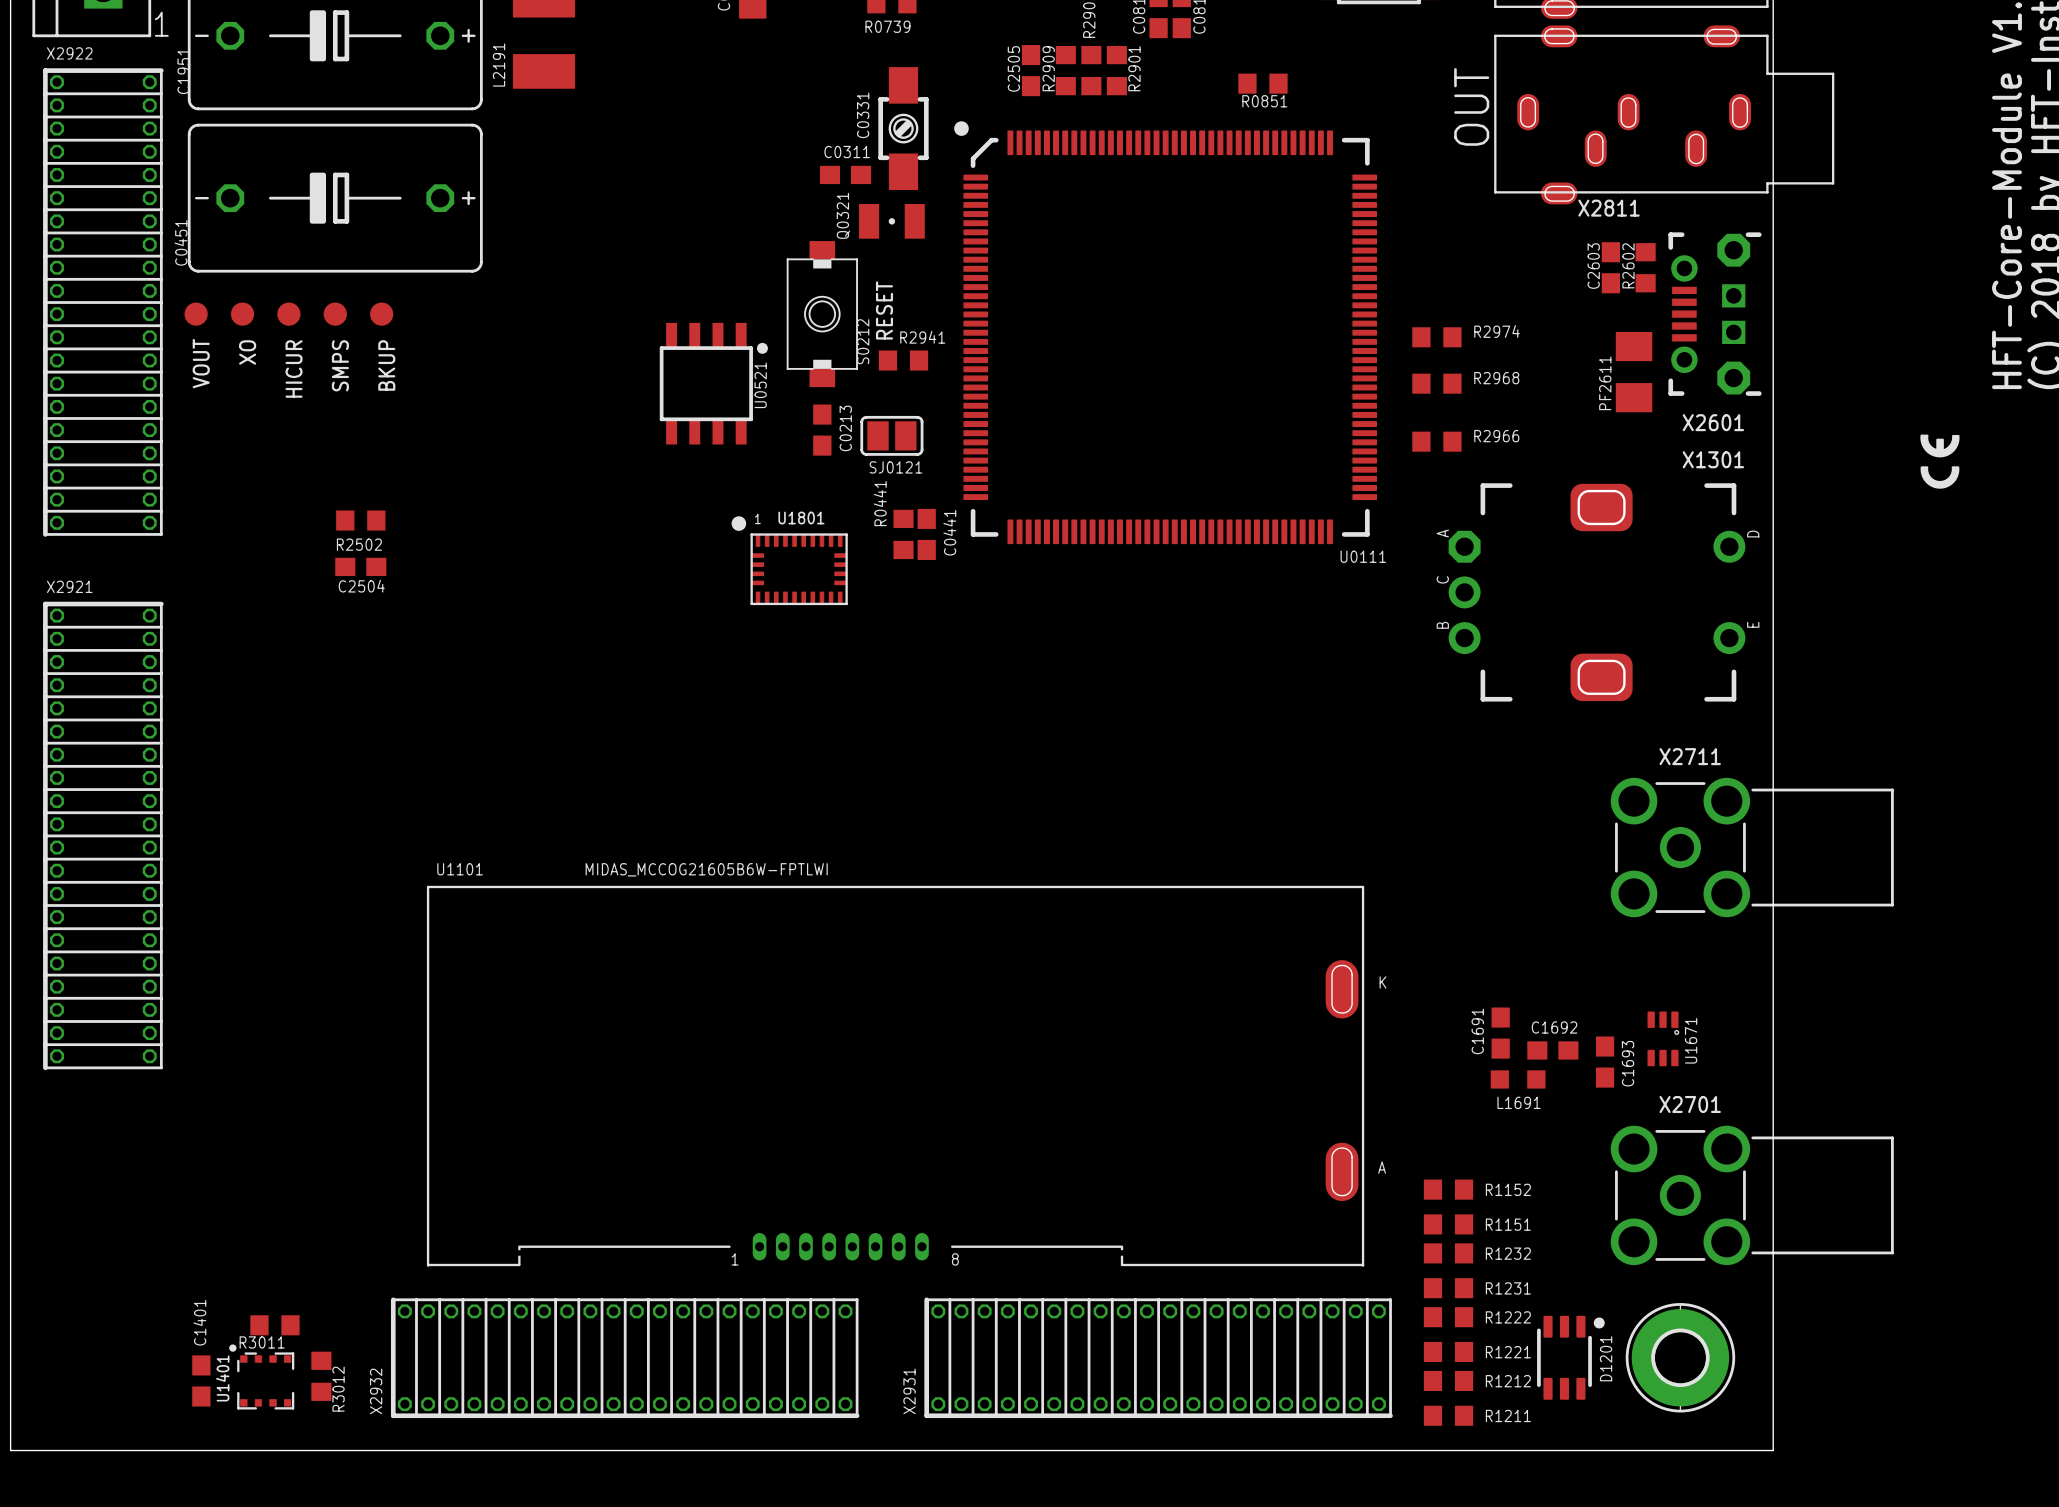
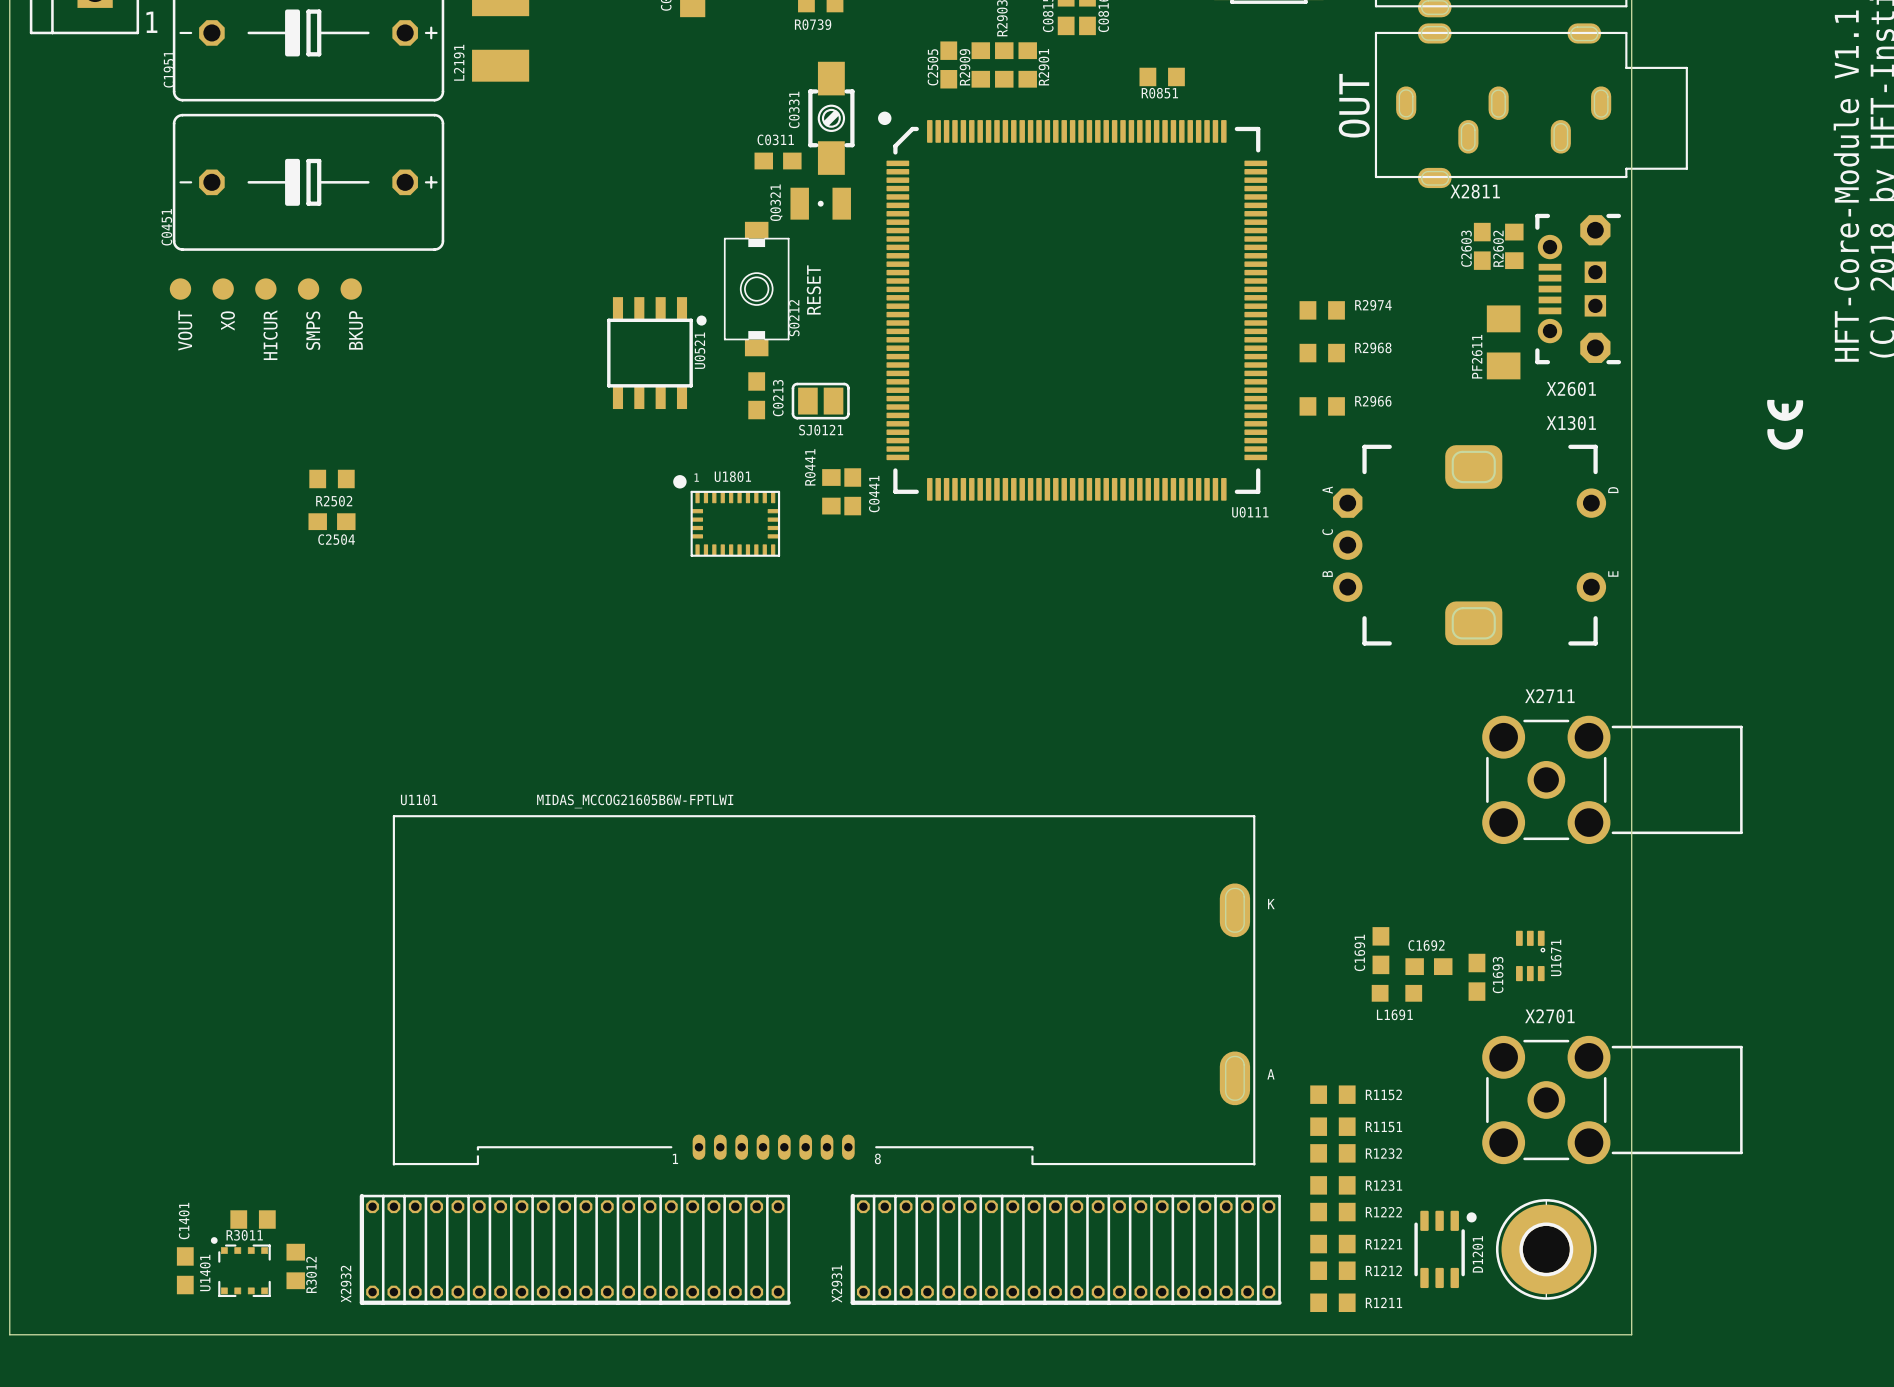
X2922: (103, 302) -> none
R2941: (903, 360) -> none
X2921: (103, 835) -> none

